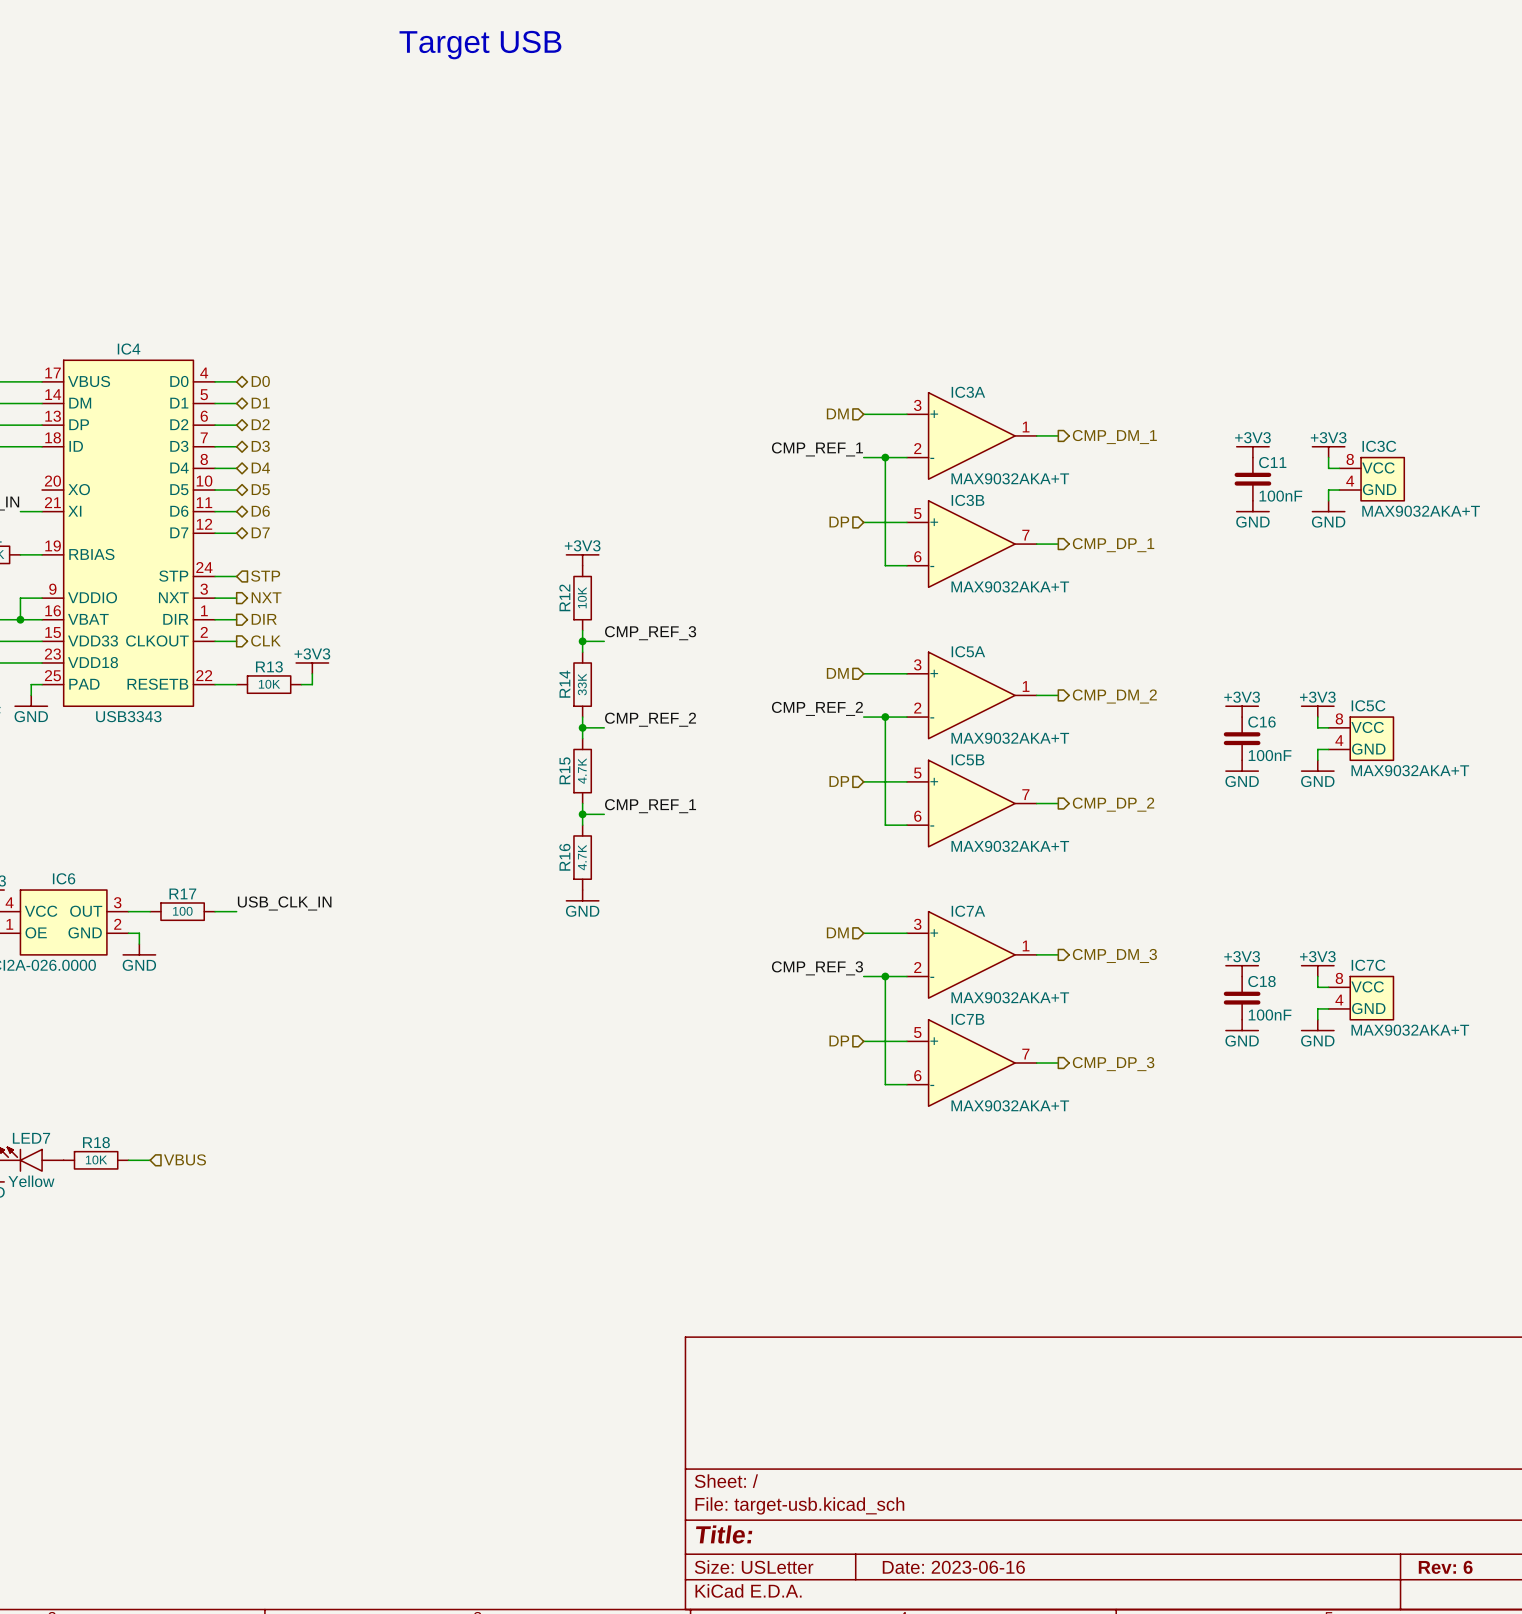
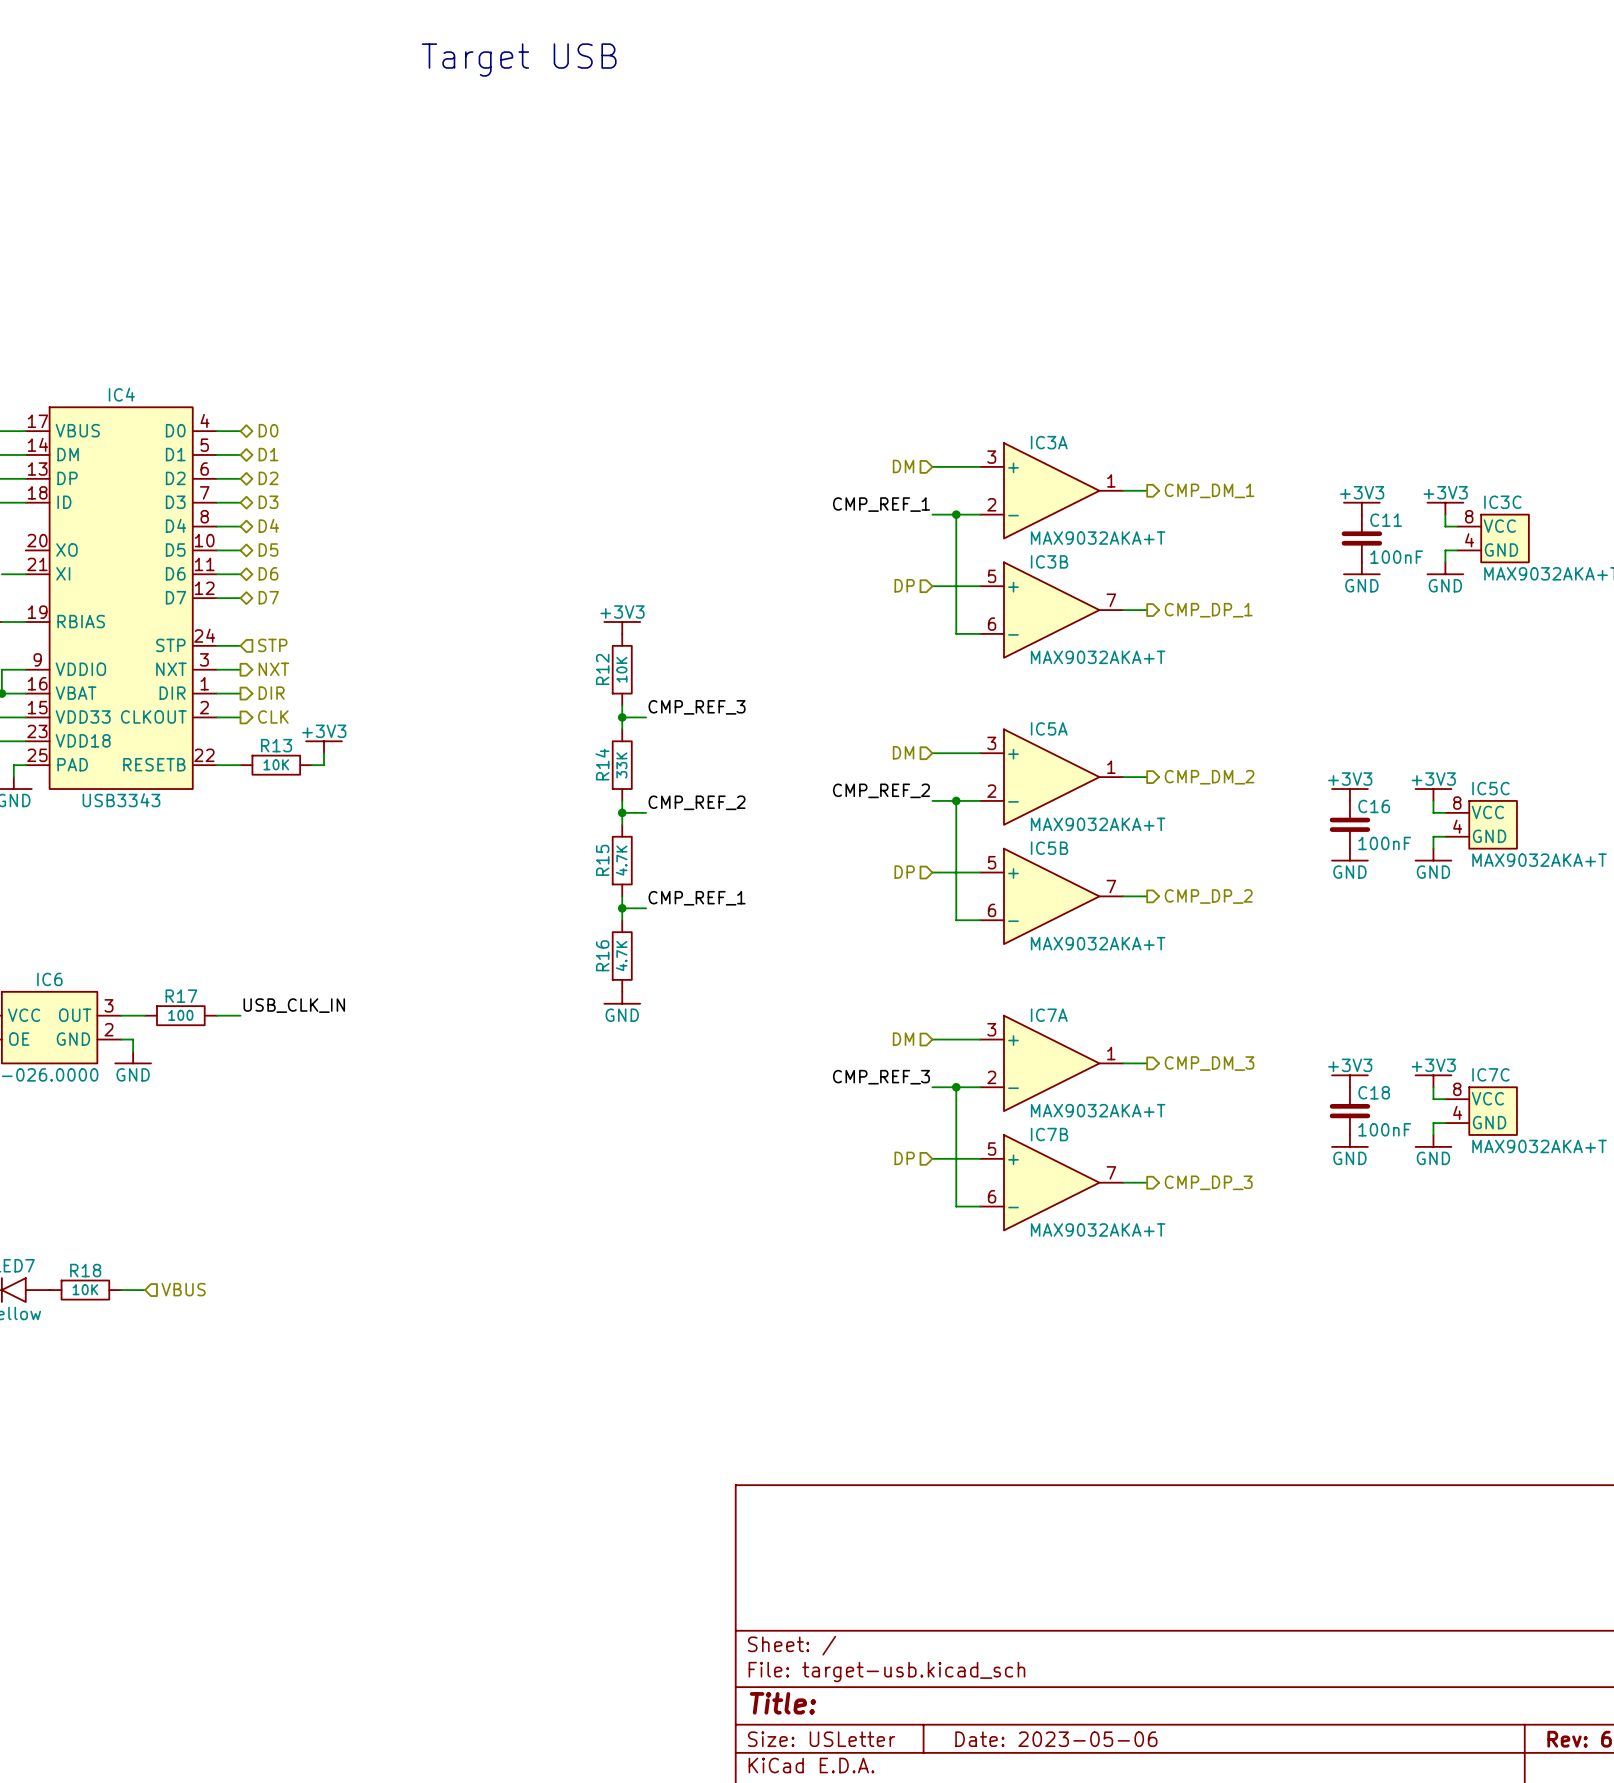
title block: Date: 2023-06-16 (953, 1567) -> Date: 2023-05-06 (1056, 1739)

